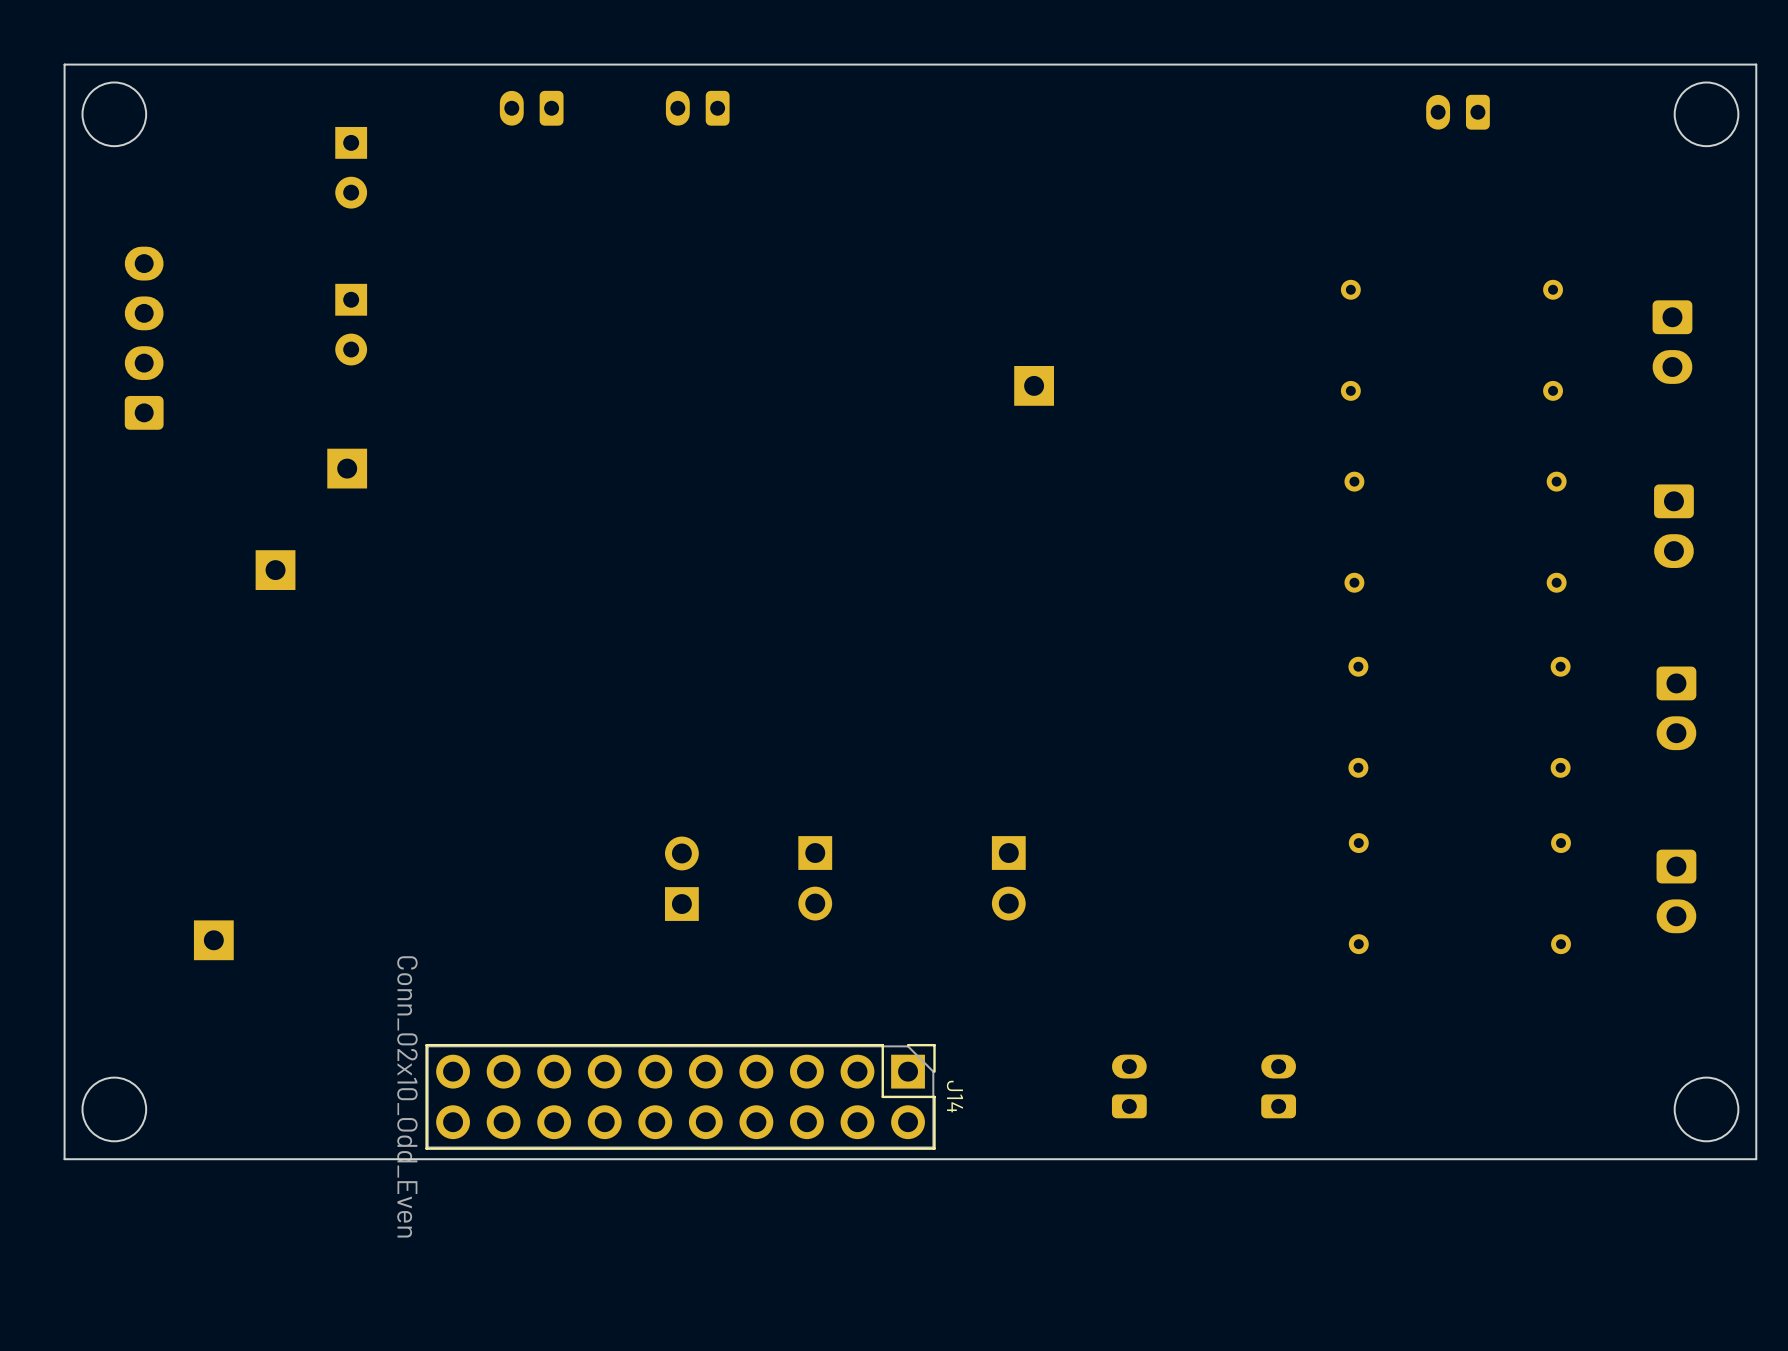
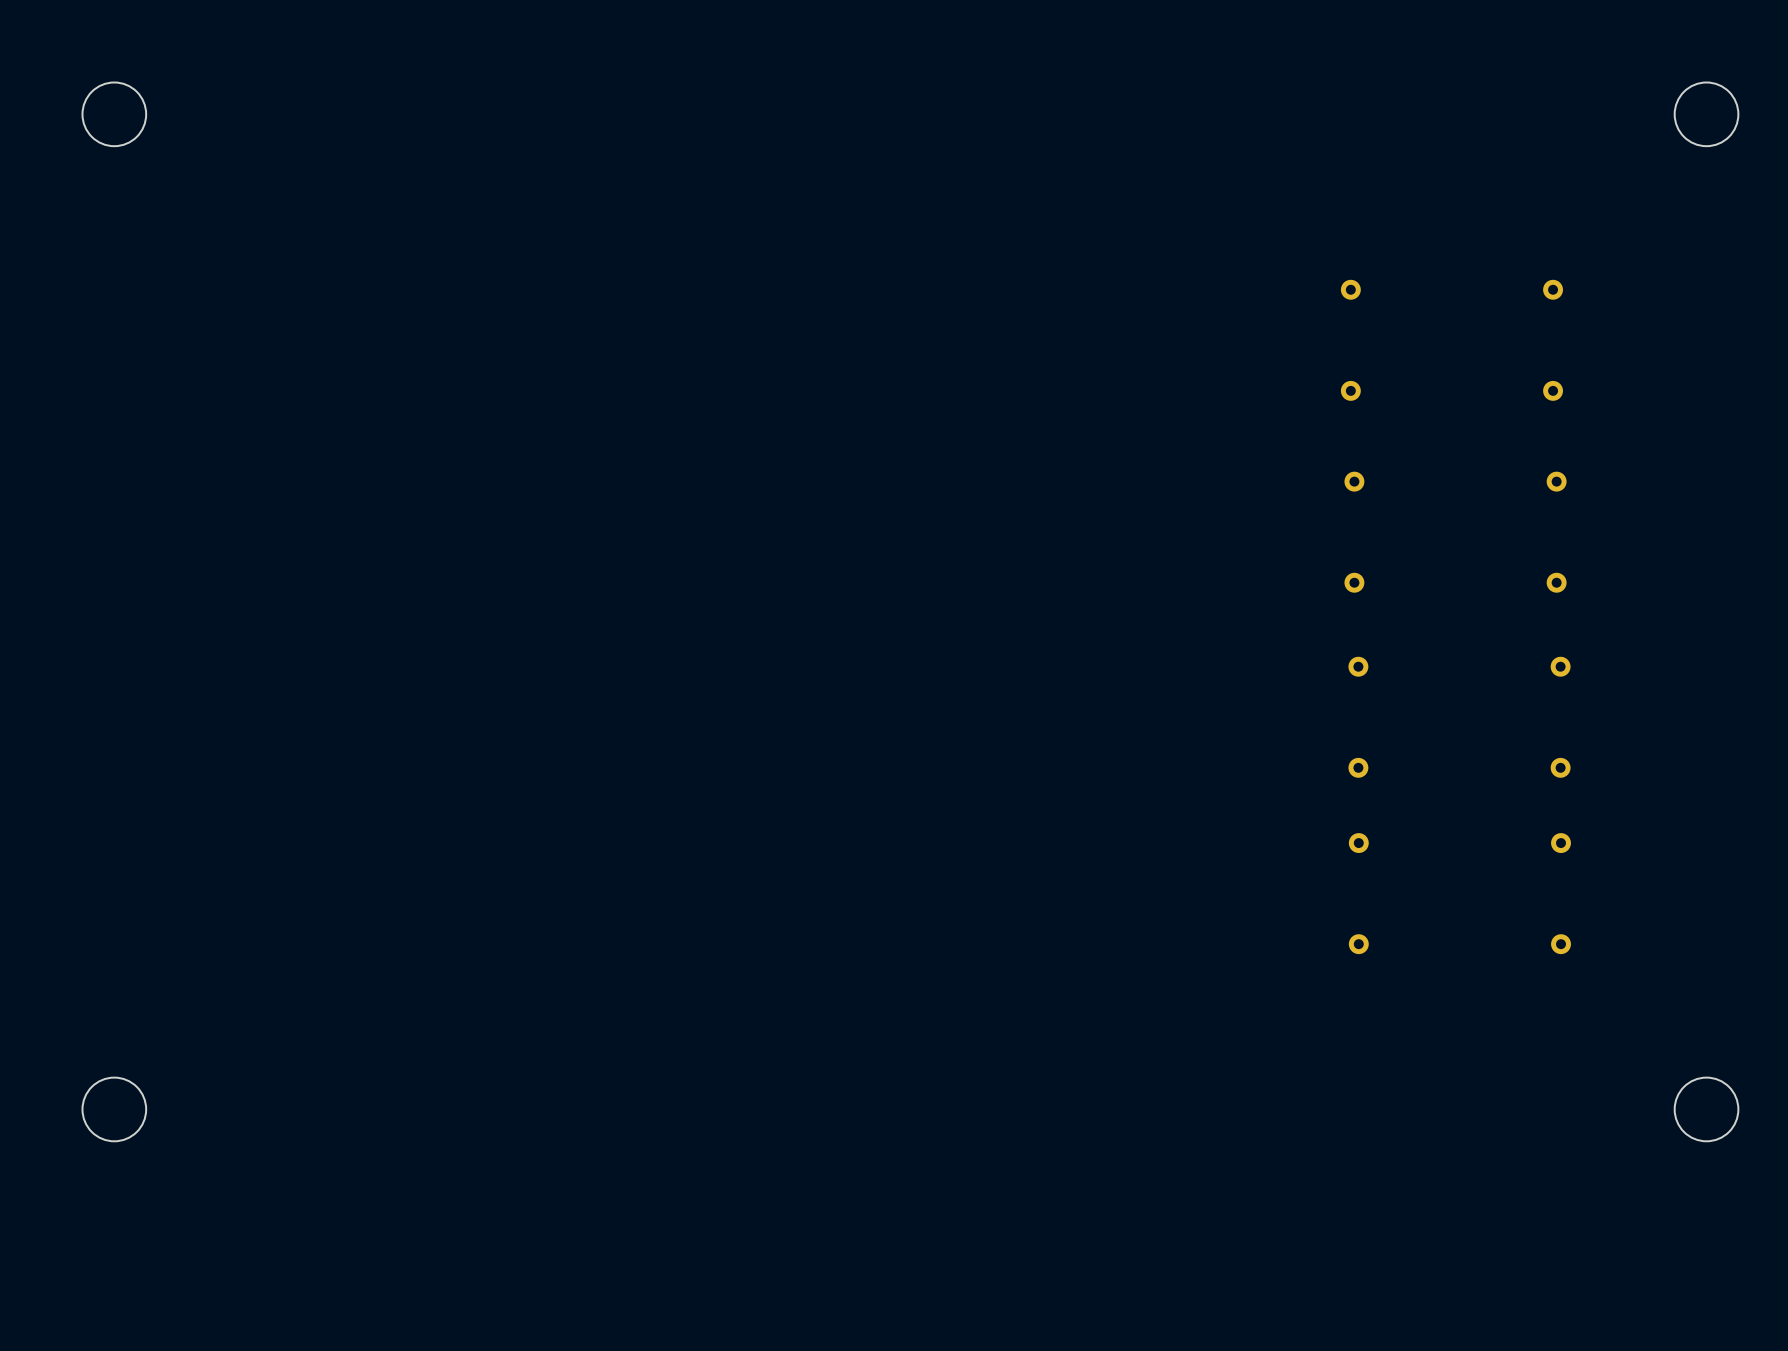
board edge: (1756, 64) (1756, 1159) (64, 1159) (64, 64) (1756, 64) -> none
part: (531, 108) -> none
part: (697, 108) -> none
part: (1458, 112) -> none
part: (351, 167) -> none
part: (351, 324) -> none
part: (144, 338) -> none
part: (1672, 342) -> none
part: (1034, 385) -> none
part: (347, 468) -> none
part: (1673, 526) -> none
part: (275, 570) -> none
part: (1676, 708) -> none
part: (681, 878) -> none
part: (815, 878) -> none
part: (1008, 878) -> none
part: (1676, 891) -> none
part: (213, 940) -> none
part: (1129, 1086) -> none
part: (1278, 1086) -> none
J14: Conn_02x10_Odd_Even (680, 1096) -> none

